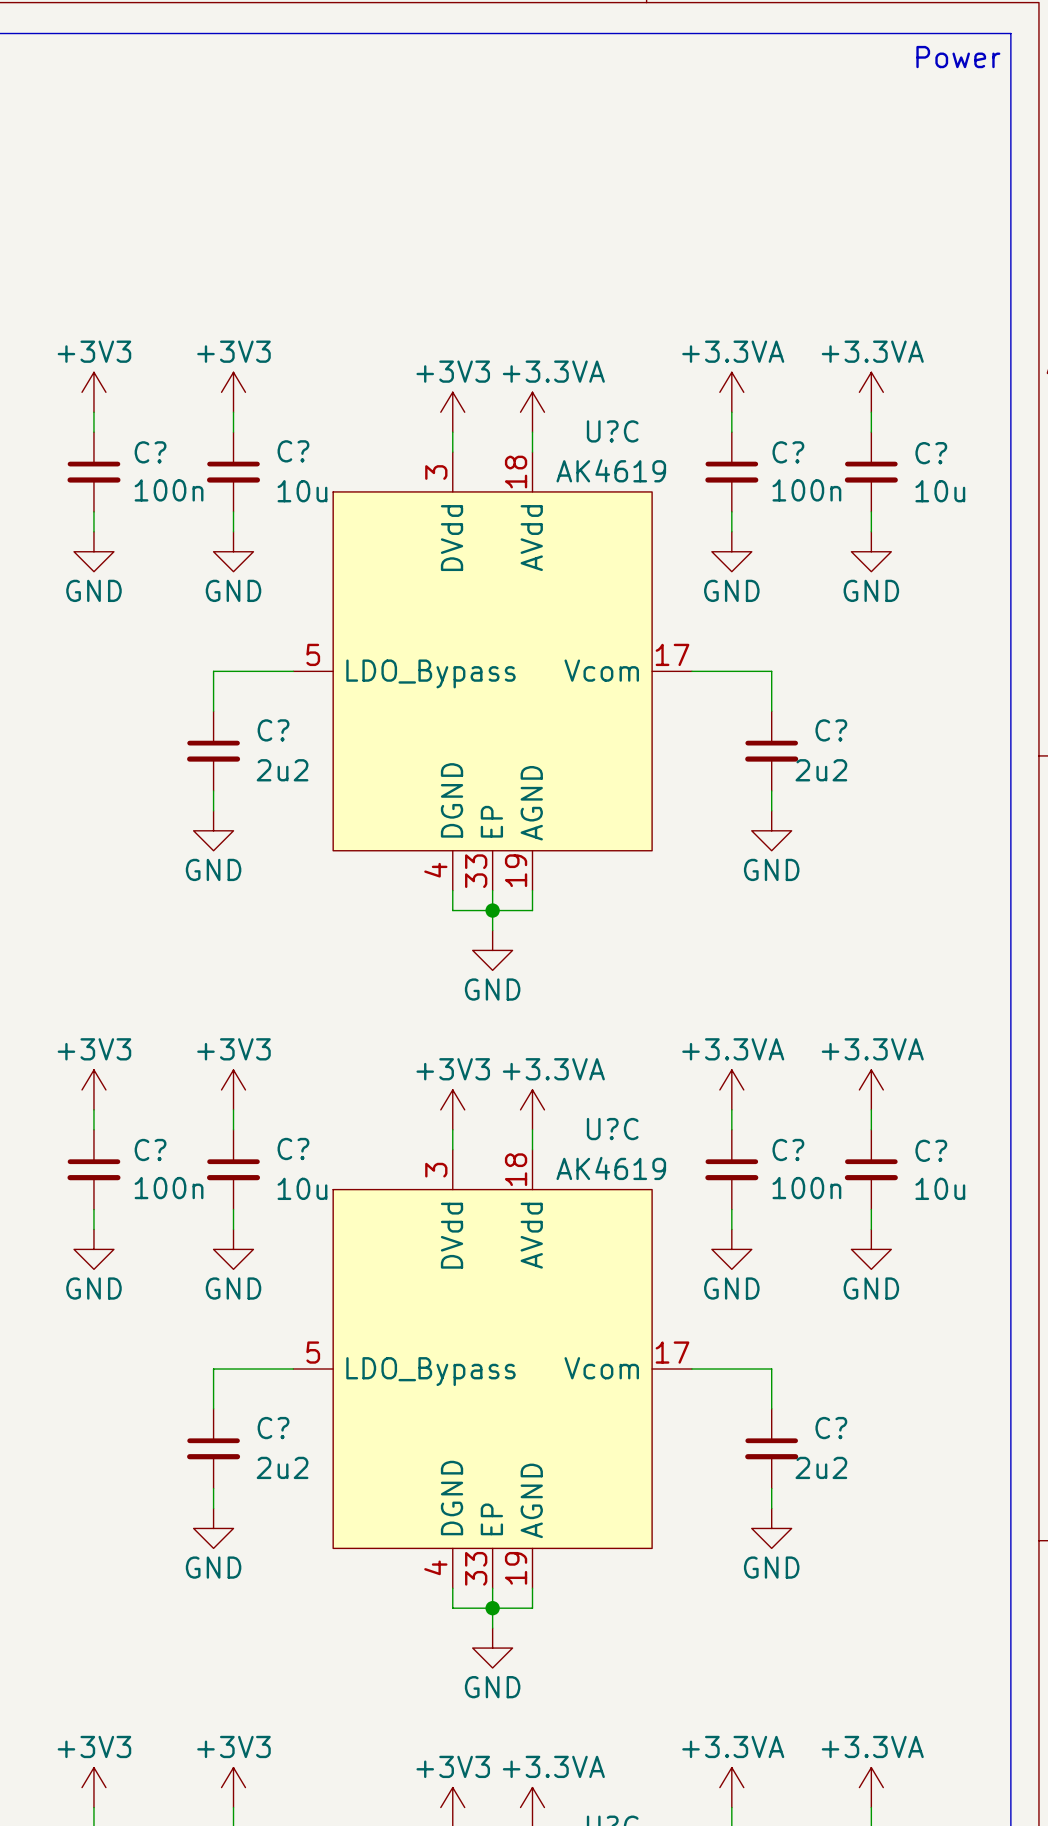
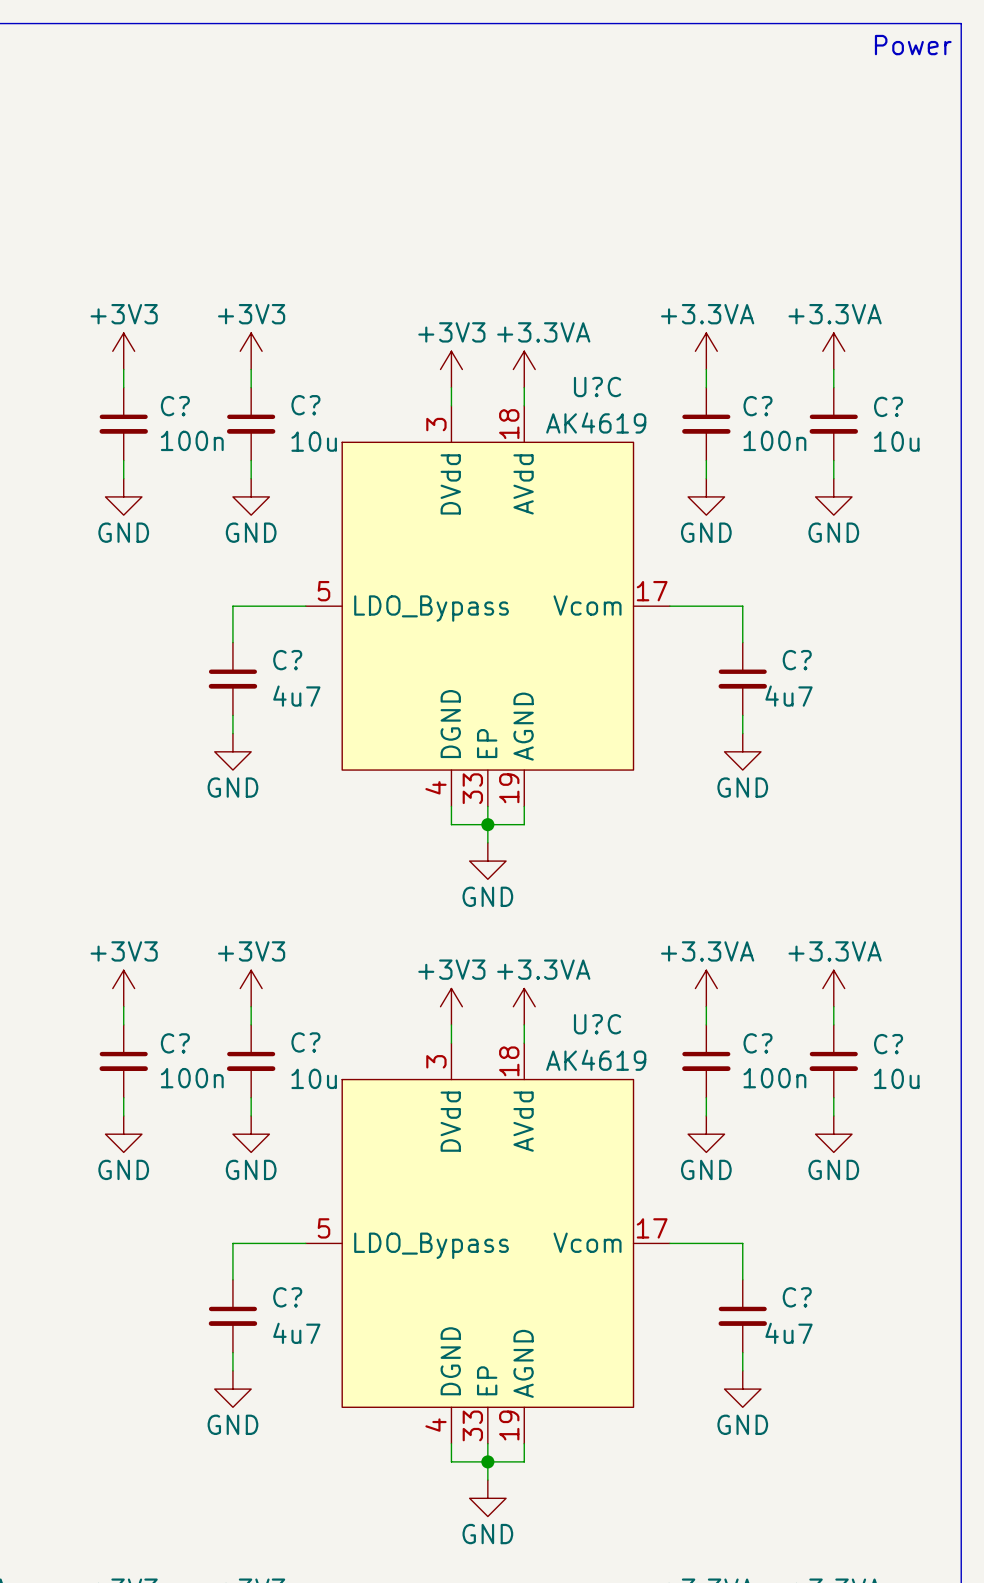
C? value: 2u2 (282, 770) -> 4u7 (296, 696)
C? value: 2u2 (821, 770) -> 4u7 (789, 696)
C? value: 2u2 (282, 1467) -> 4u7 (296, 1333)
C? value: 2u2 (821, 1467) -> 4u7 (789, 1333)

